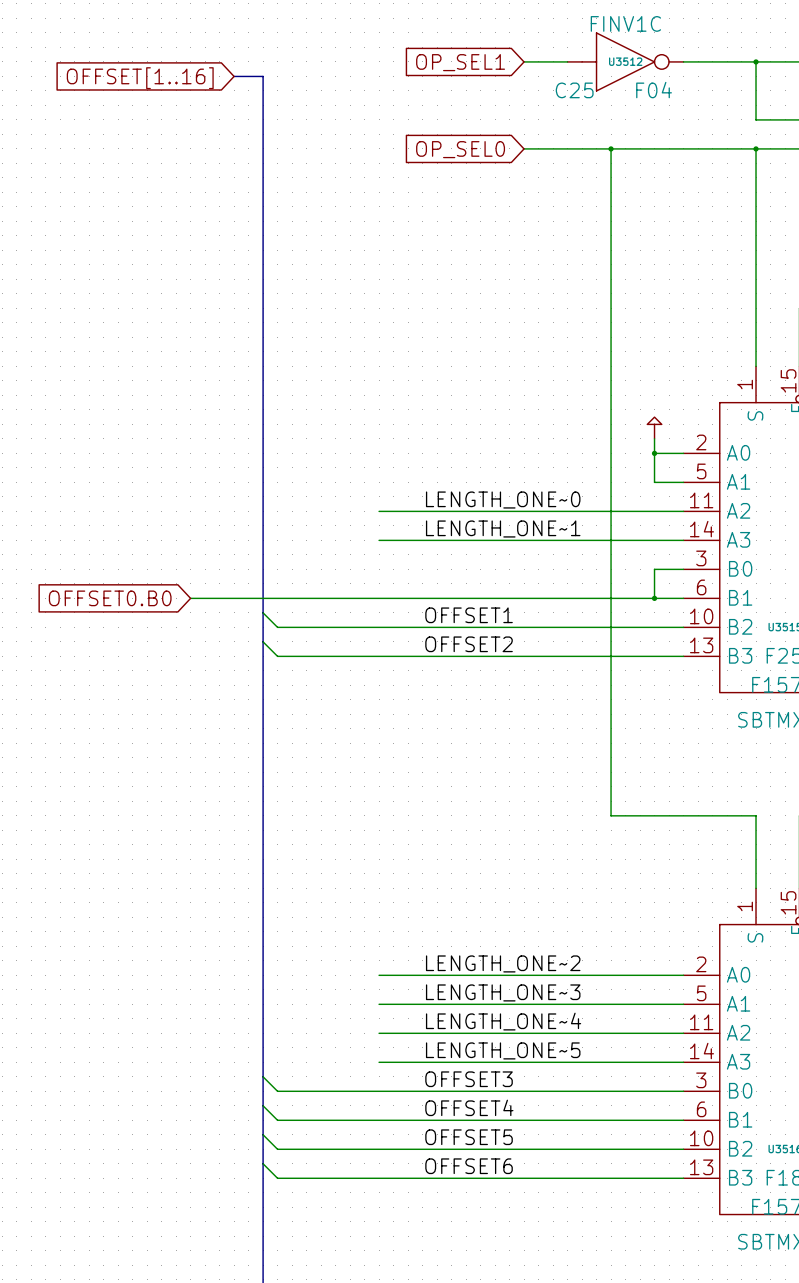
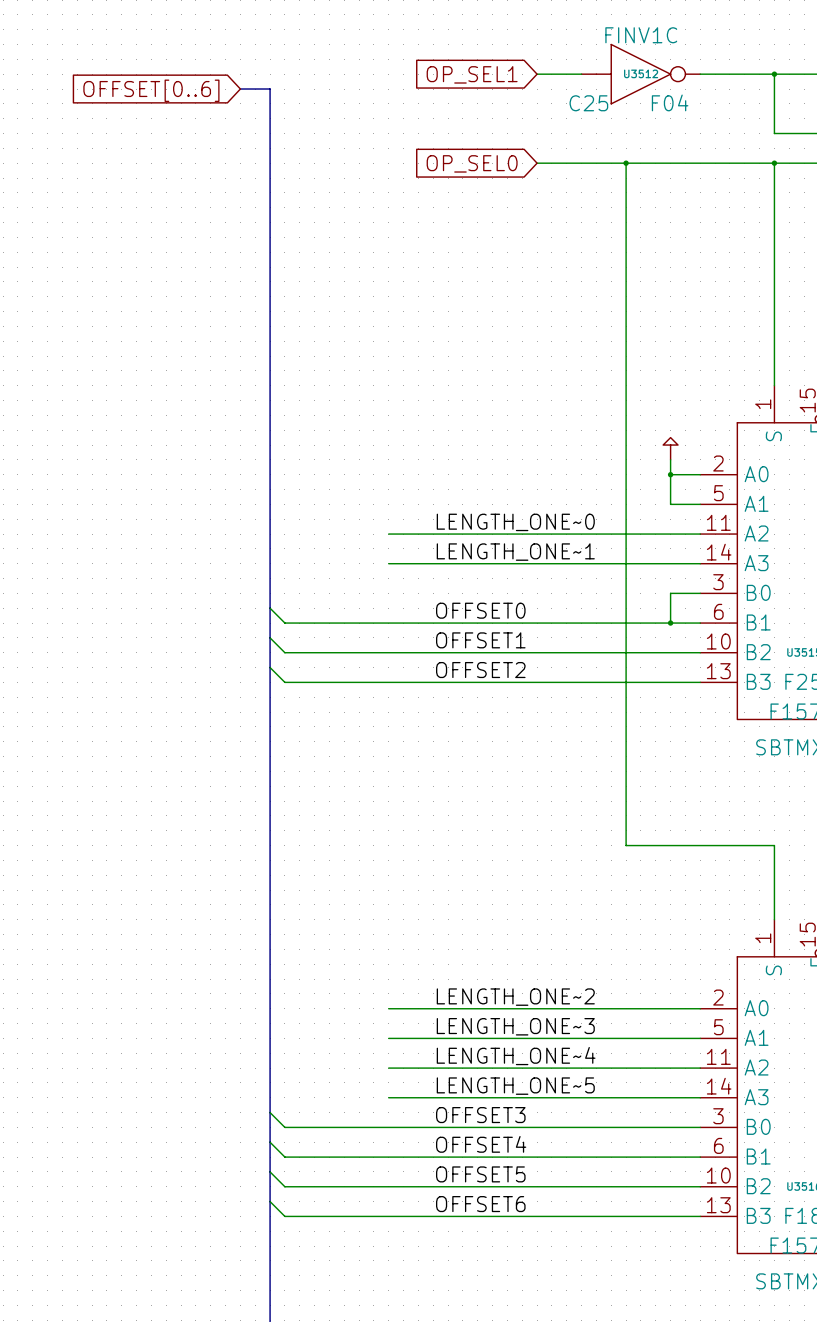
global label: OFFSET[1..16] (140, 78) -> OFFSET[0..6] (151, 90)
label: none -> OFFSET0 (480, 610)
global label: OFFSET0.B0 (110, 598) -> none
wire: (190, 598) (277, 598) -> (270, 608) (284, 623)

